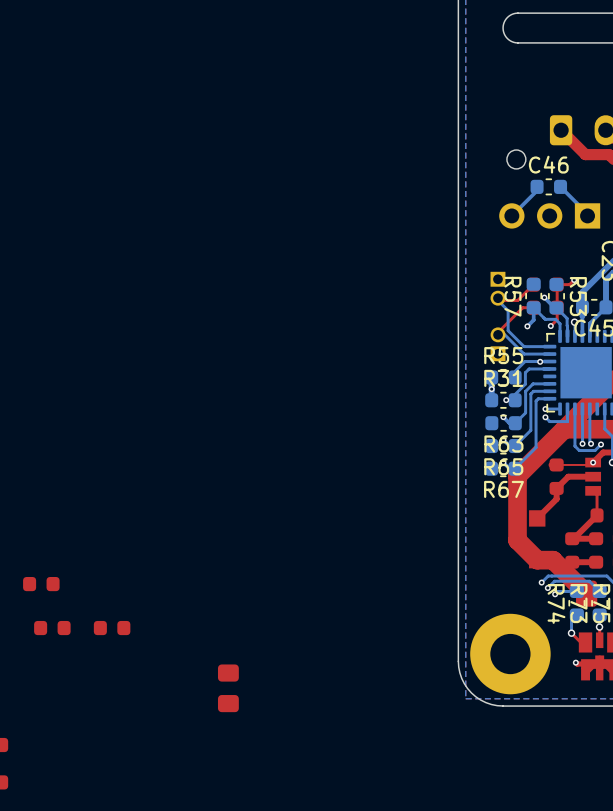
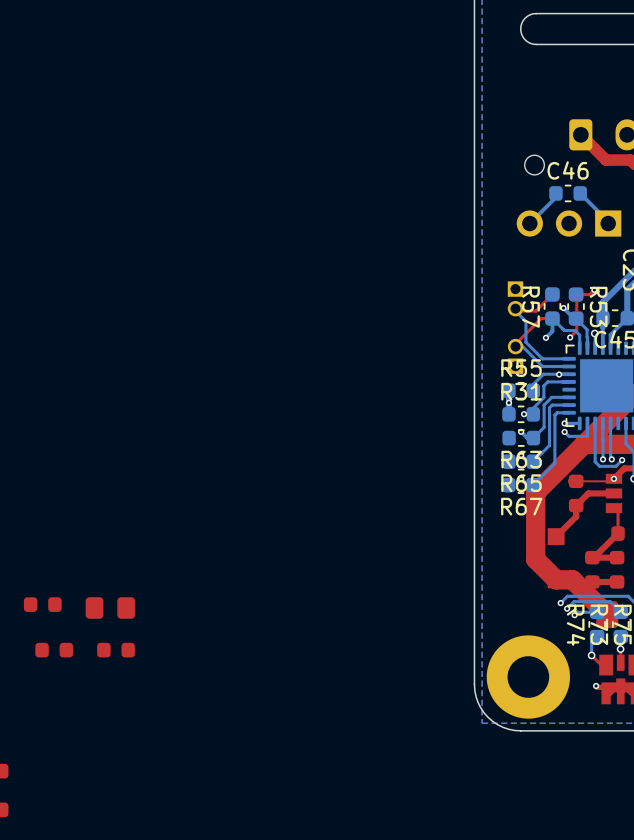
part rotation: 0° (228, 688) -> 90° clockwise (110, 607)
part position: (228, 688) -> (110, 607)

